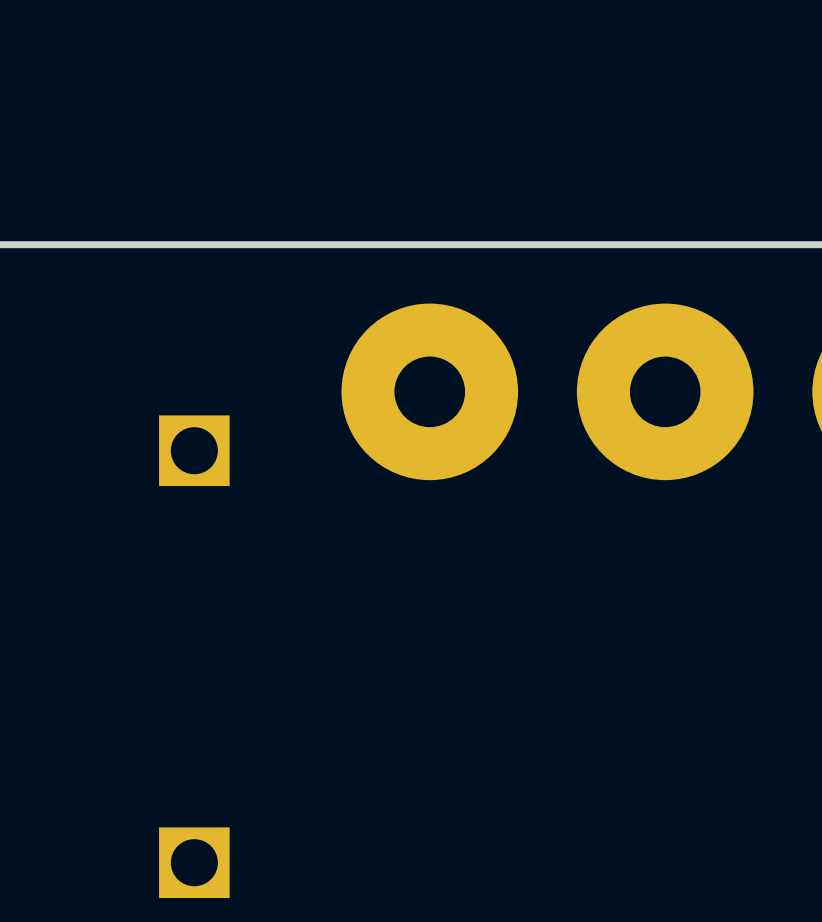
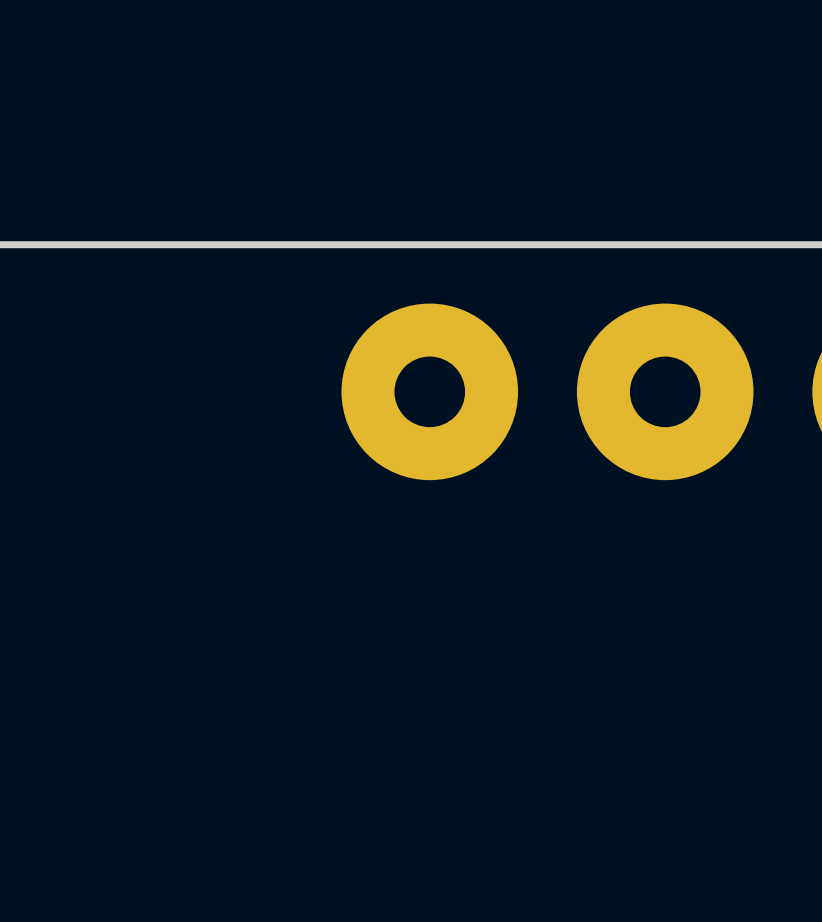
part: (194, 450) -> none
part: (194, 862) -> none

